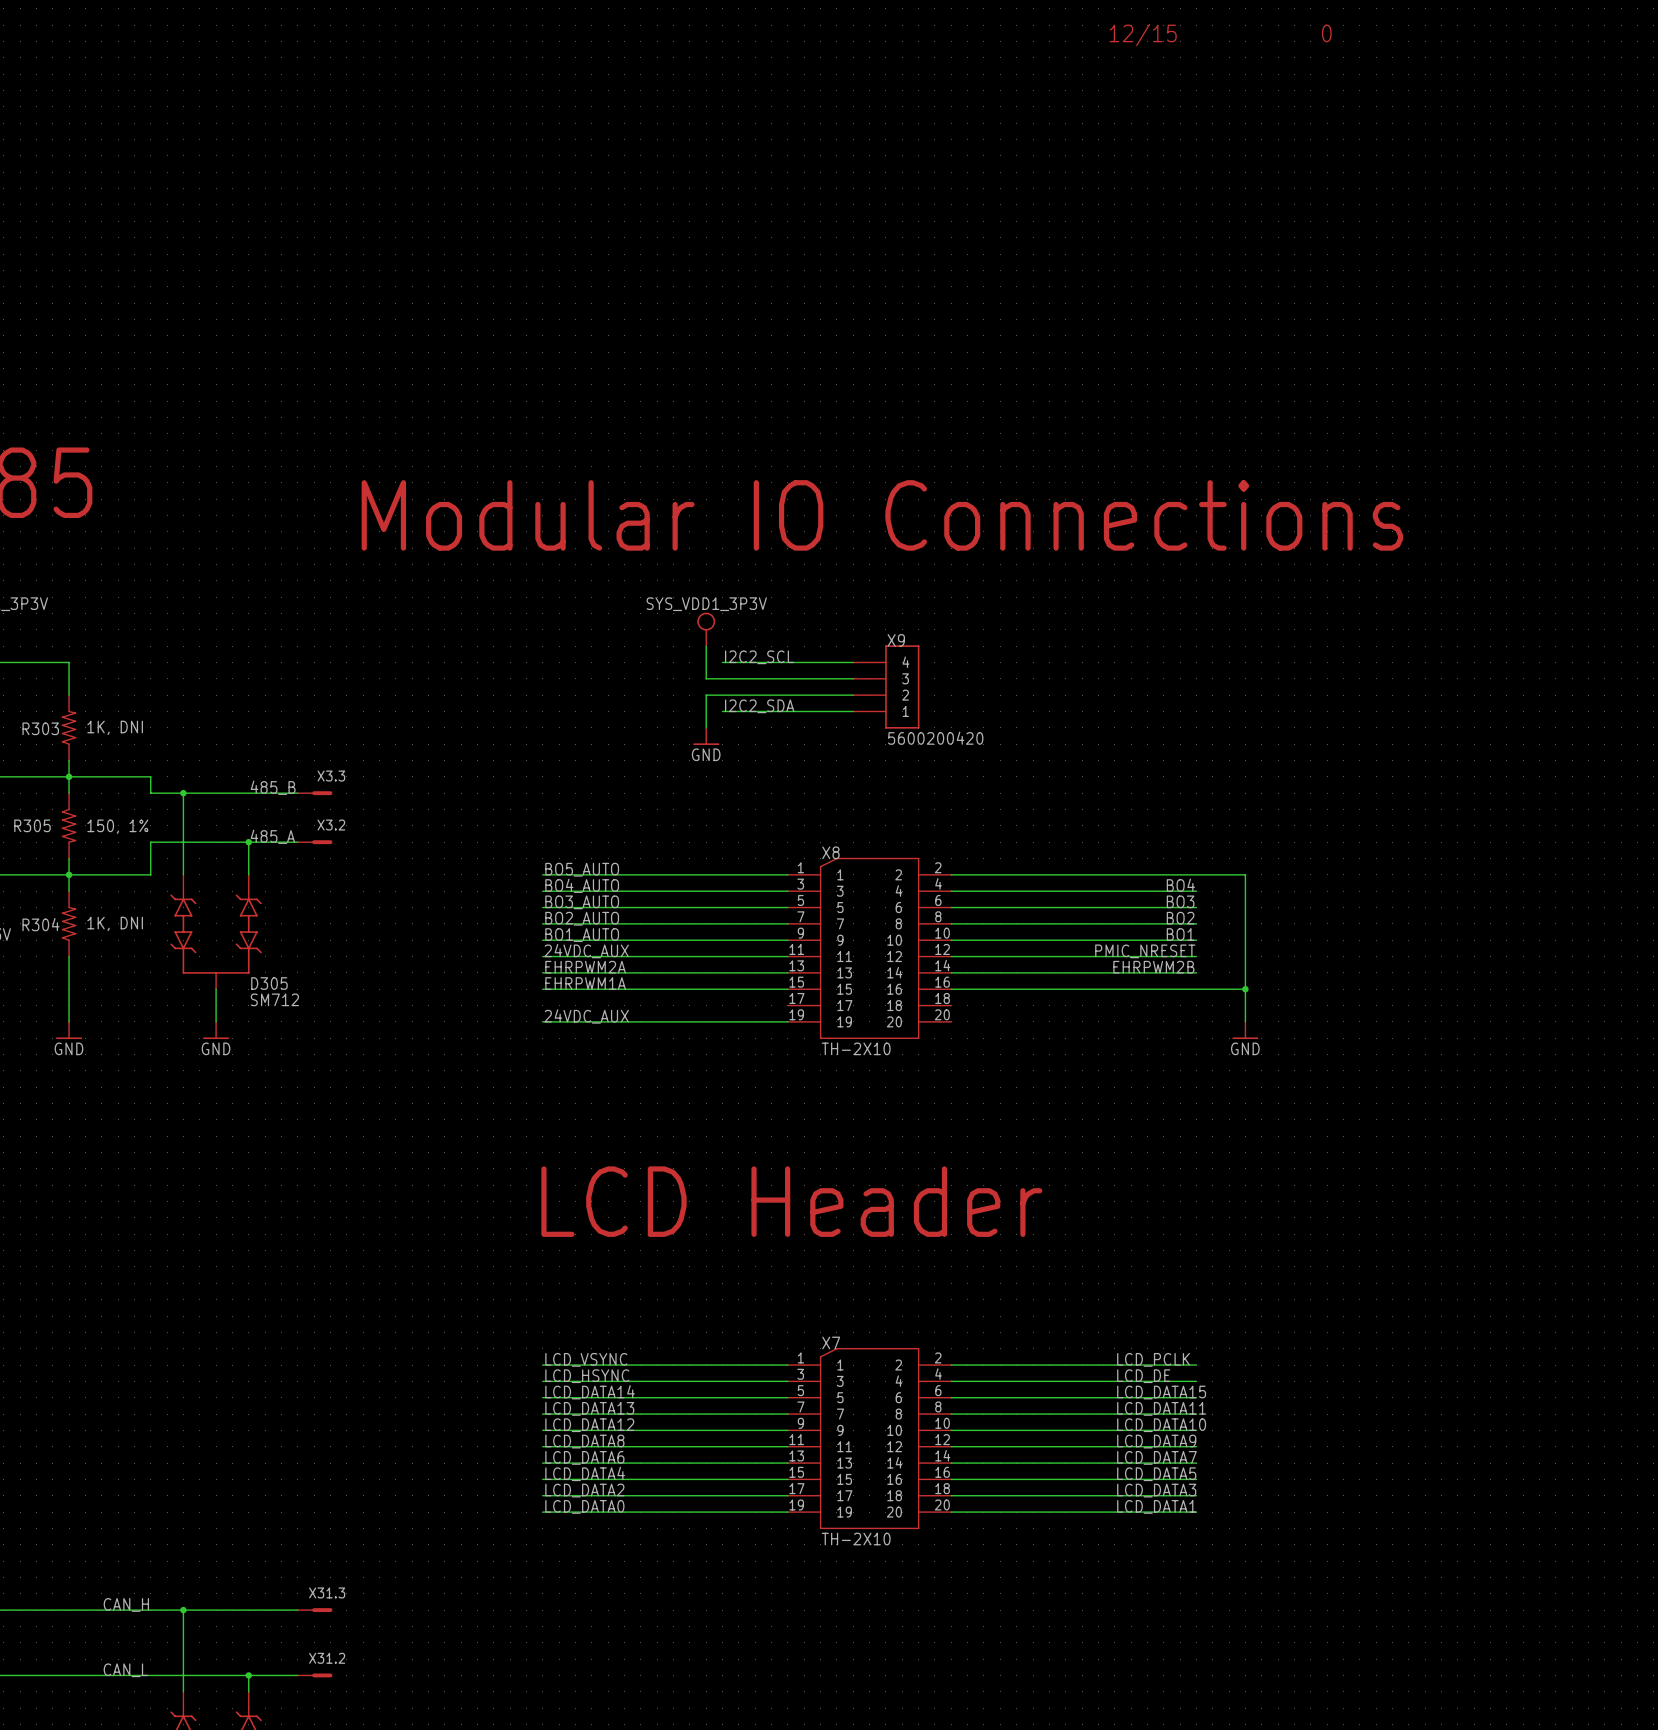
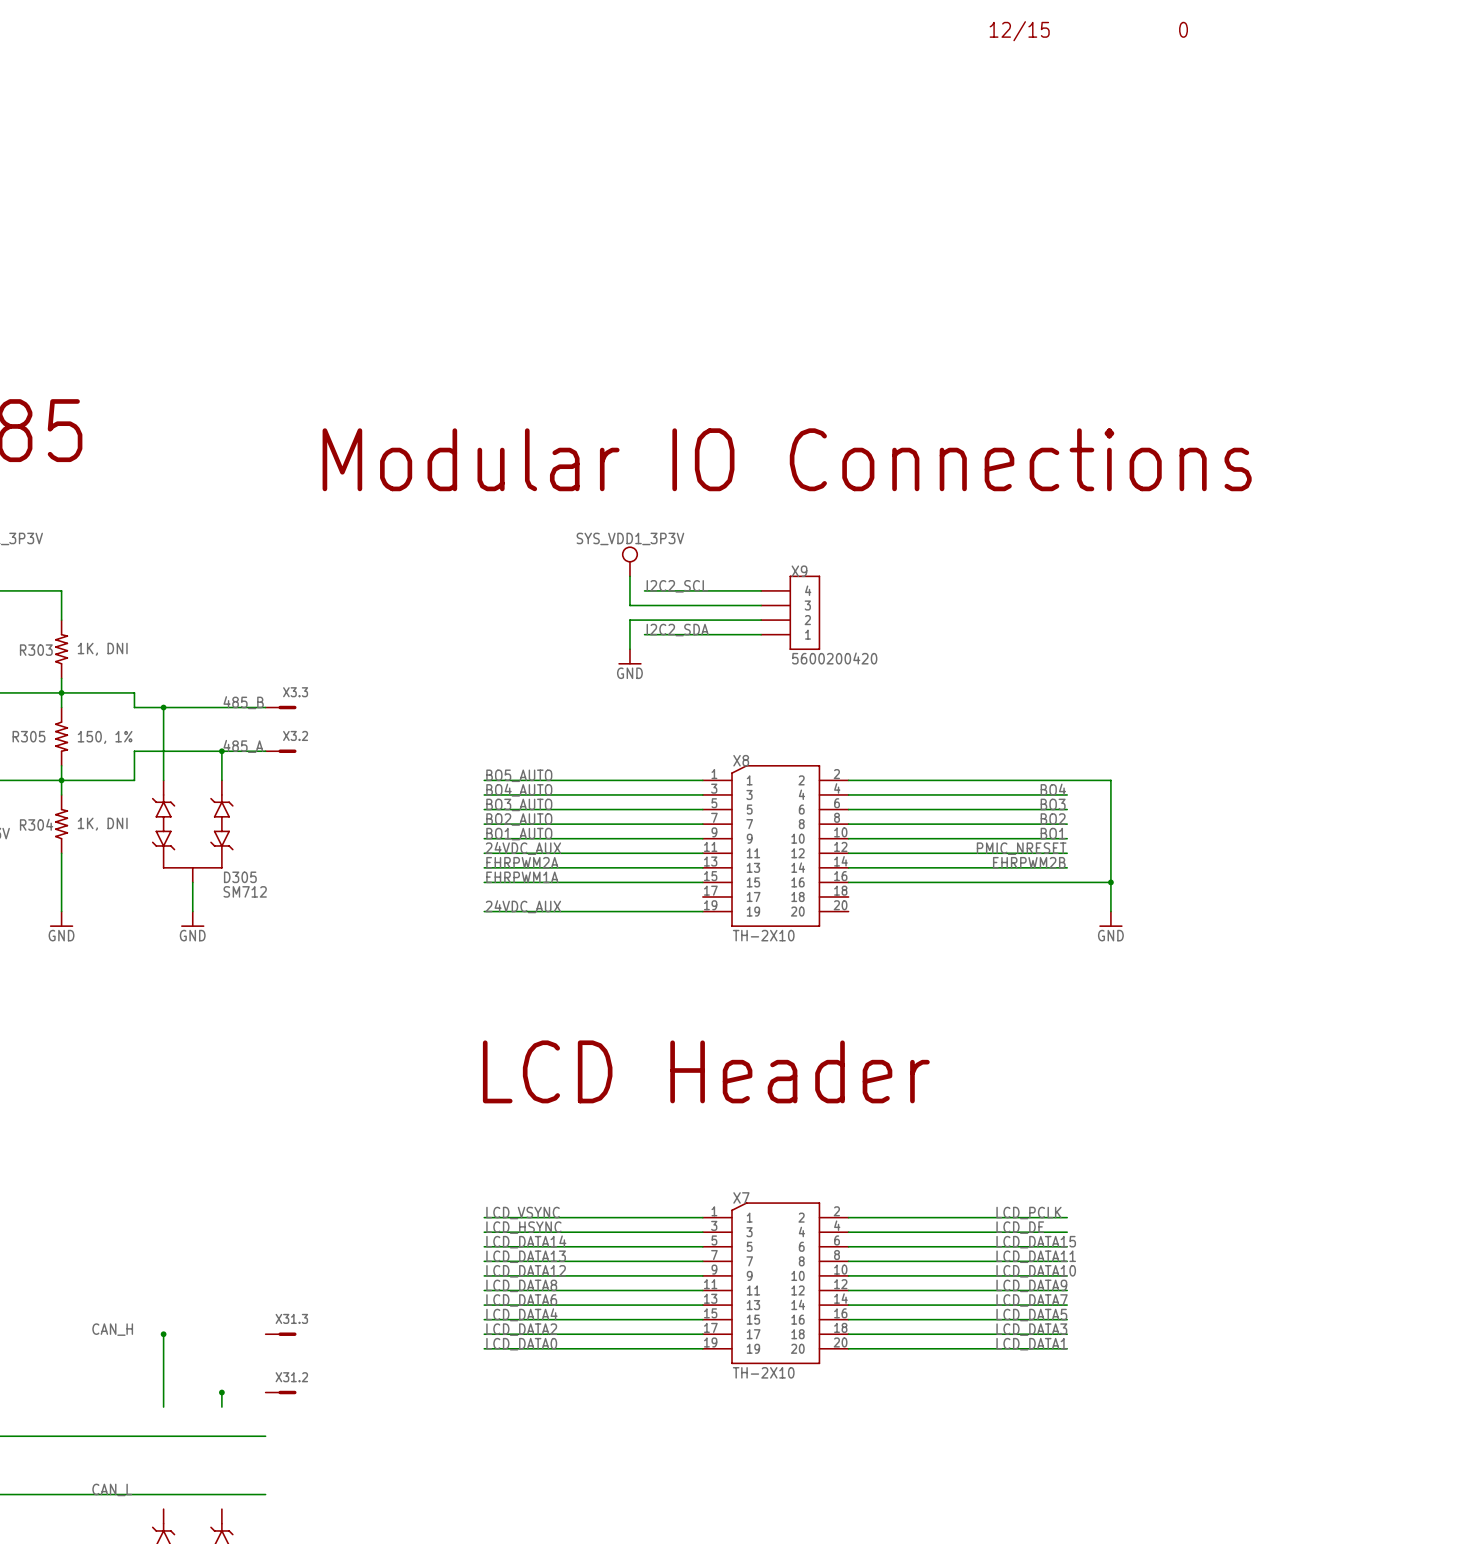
junction: none -> (163, 1334)
junction: none -> (221, 1392)
label position: CAN_H (126, 1604) -> CAN_H (112, 1329)
wire: (183, 1610) (183, 1691) -> (163, 1334) (163, 1407)
junction: (183, 1610) -> none
X31.3 position: (315, 1610) -> (281, 1334)
wire: (248, 1675) (248, 1691) -> (221, 1392) (221, 1407)
junction: (248, 1675) -> none
X31.2 position: (315, 1675) -> (281, 1392)

